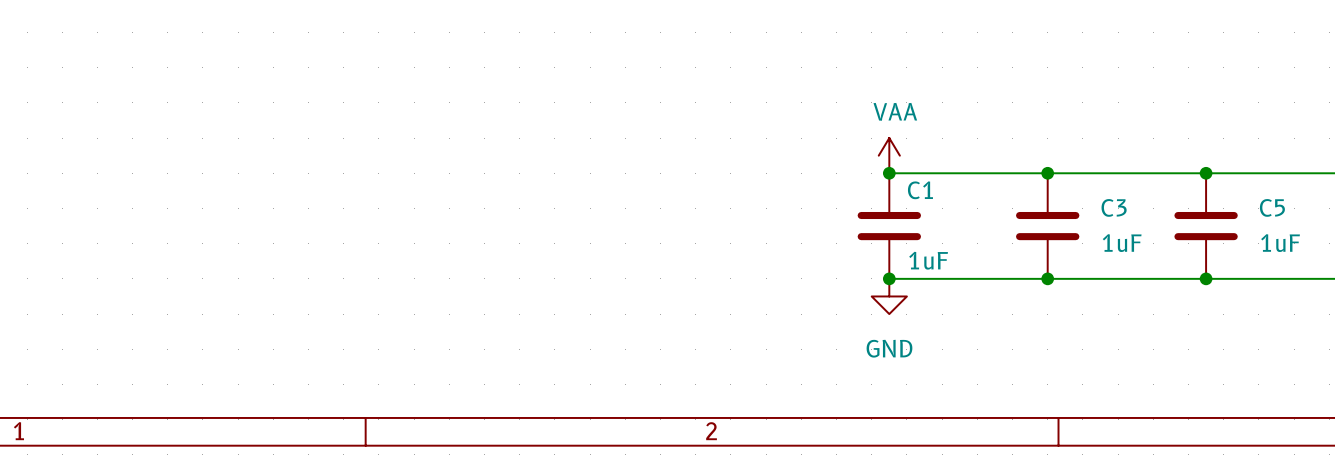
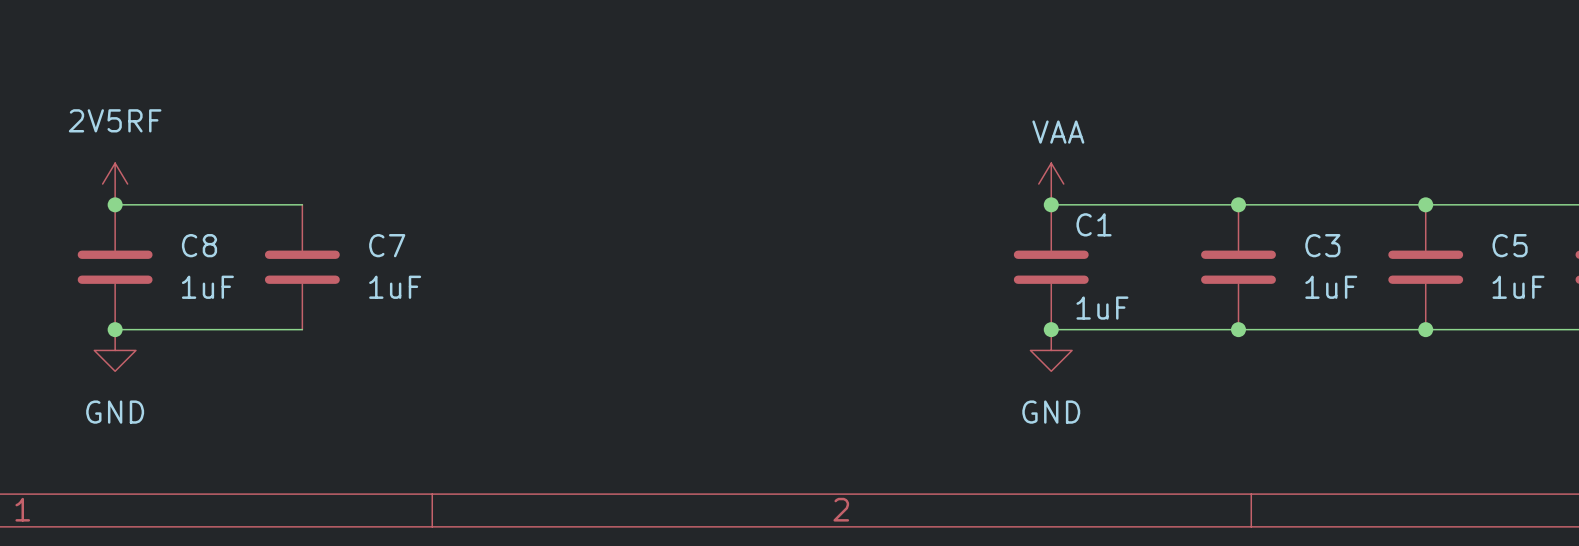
power symbol: none -> 2V5RF (115, 184)
wire: none -> (115, 204) (302, 204)
junction: none -> (115, 204)
C8: none -> 1uF (115, 267)
C7: none -> 1uF (302, 267)
wire: none -> (115, 329) (302, 329)
junction: none -> (115, 329)
power symbol: none -> GND (115, 350)

